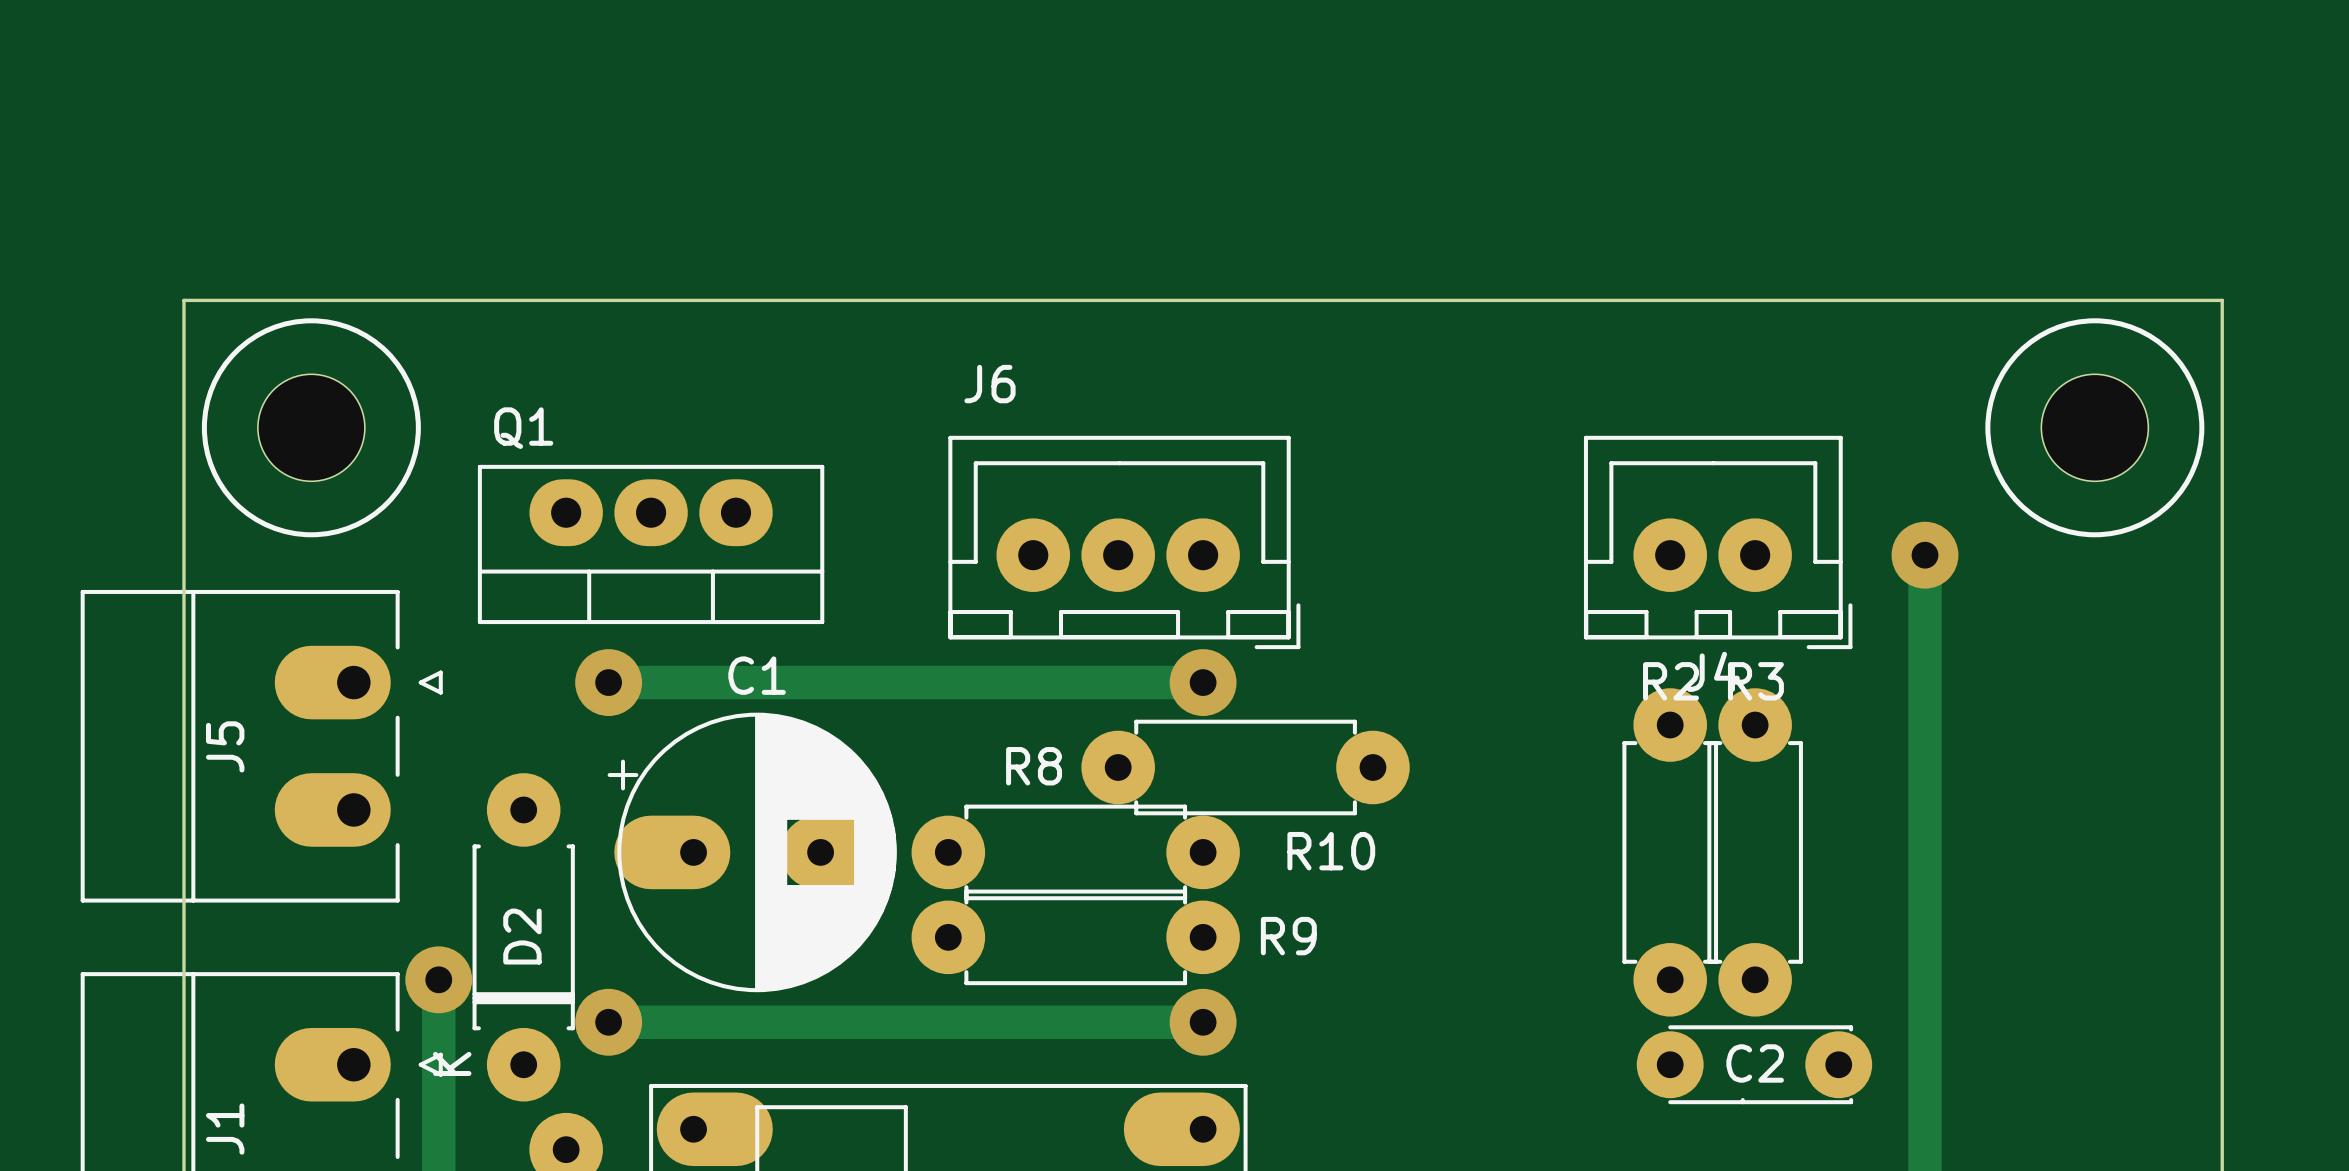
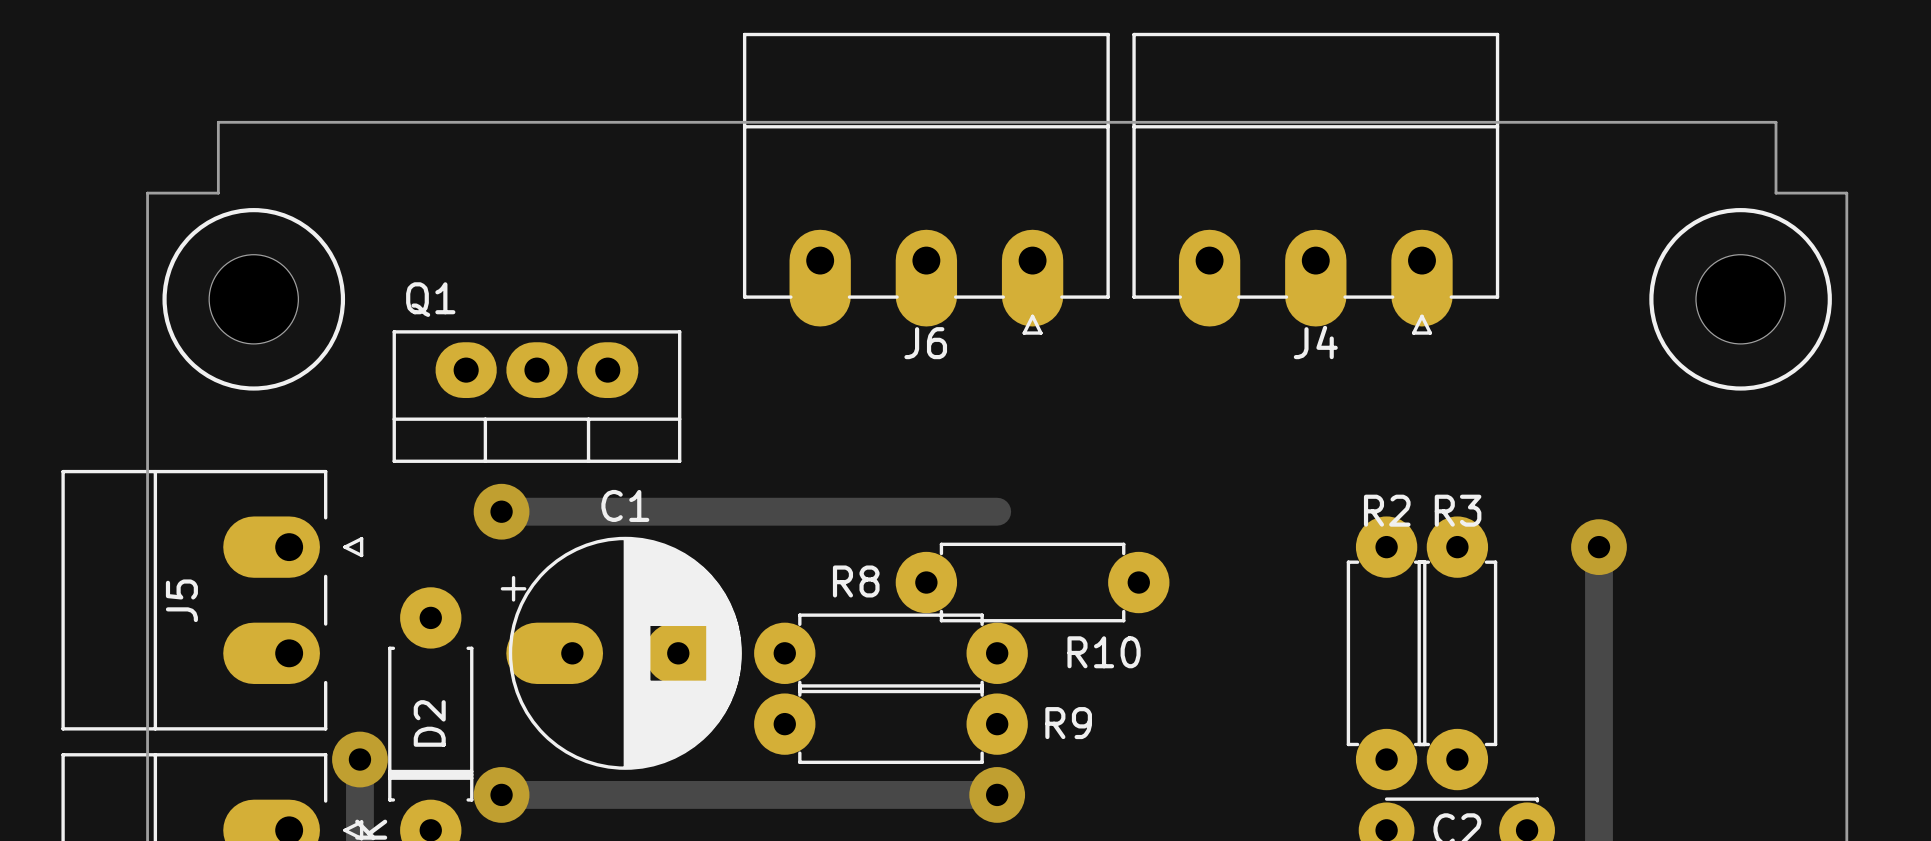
board edge: (268, 300) (2137, 300) -> (218, 193) (218, 122) (1776, 122) (1776, 193)
J6 name position: J6 (990, 384) -> J6 (925, 343)
J6 footprint: [948, 435, 1301, 650] -> [742, 32, 1110, 335]
J4 footprint: [1583, 435, 1853, 650] -> [1132, 32, 1500, 335]
track: (1924, 555) (1924, 725) -> none
via position: (1924, 555) -> (1599, 547)
via: (1203, 682) -> none
J5 position: (261, 746) -> (212, 600)

